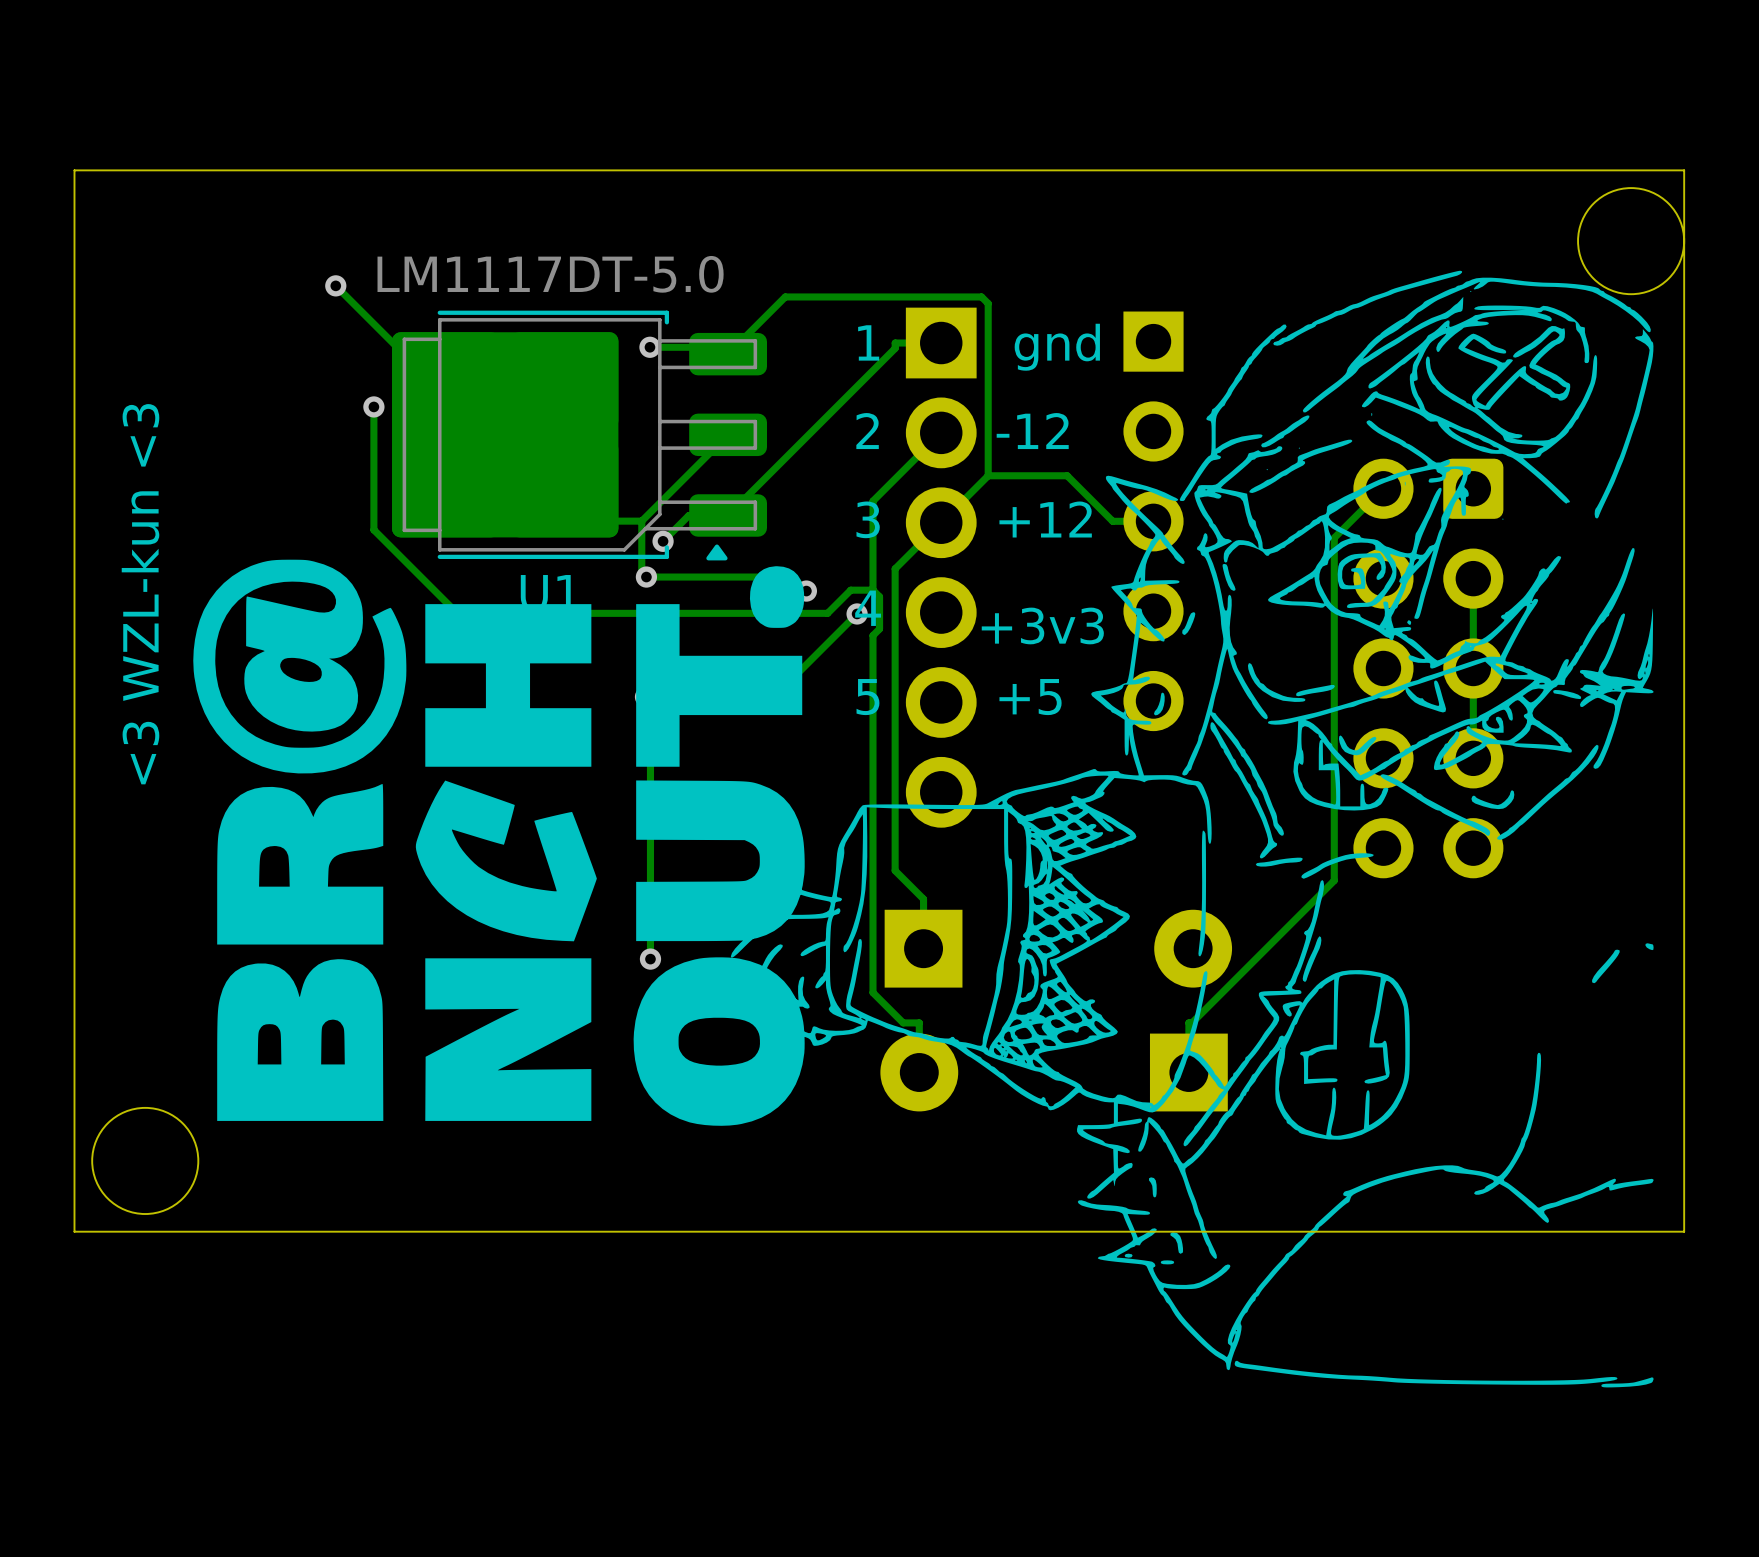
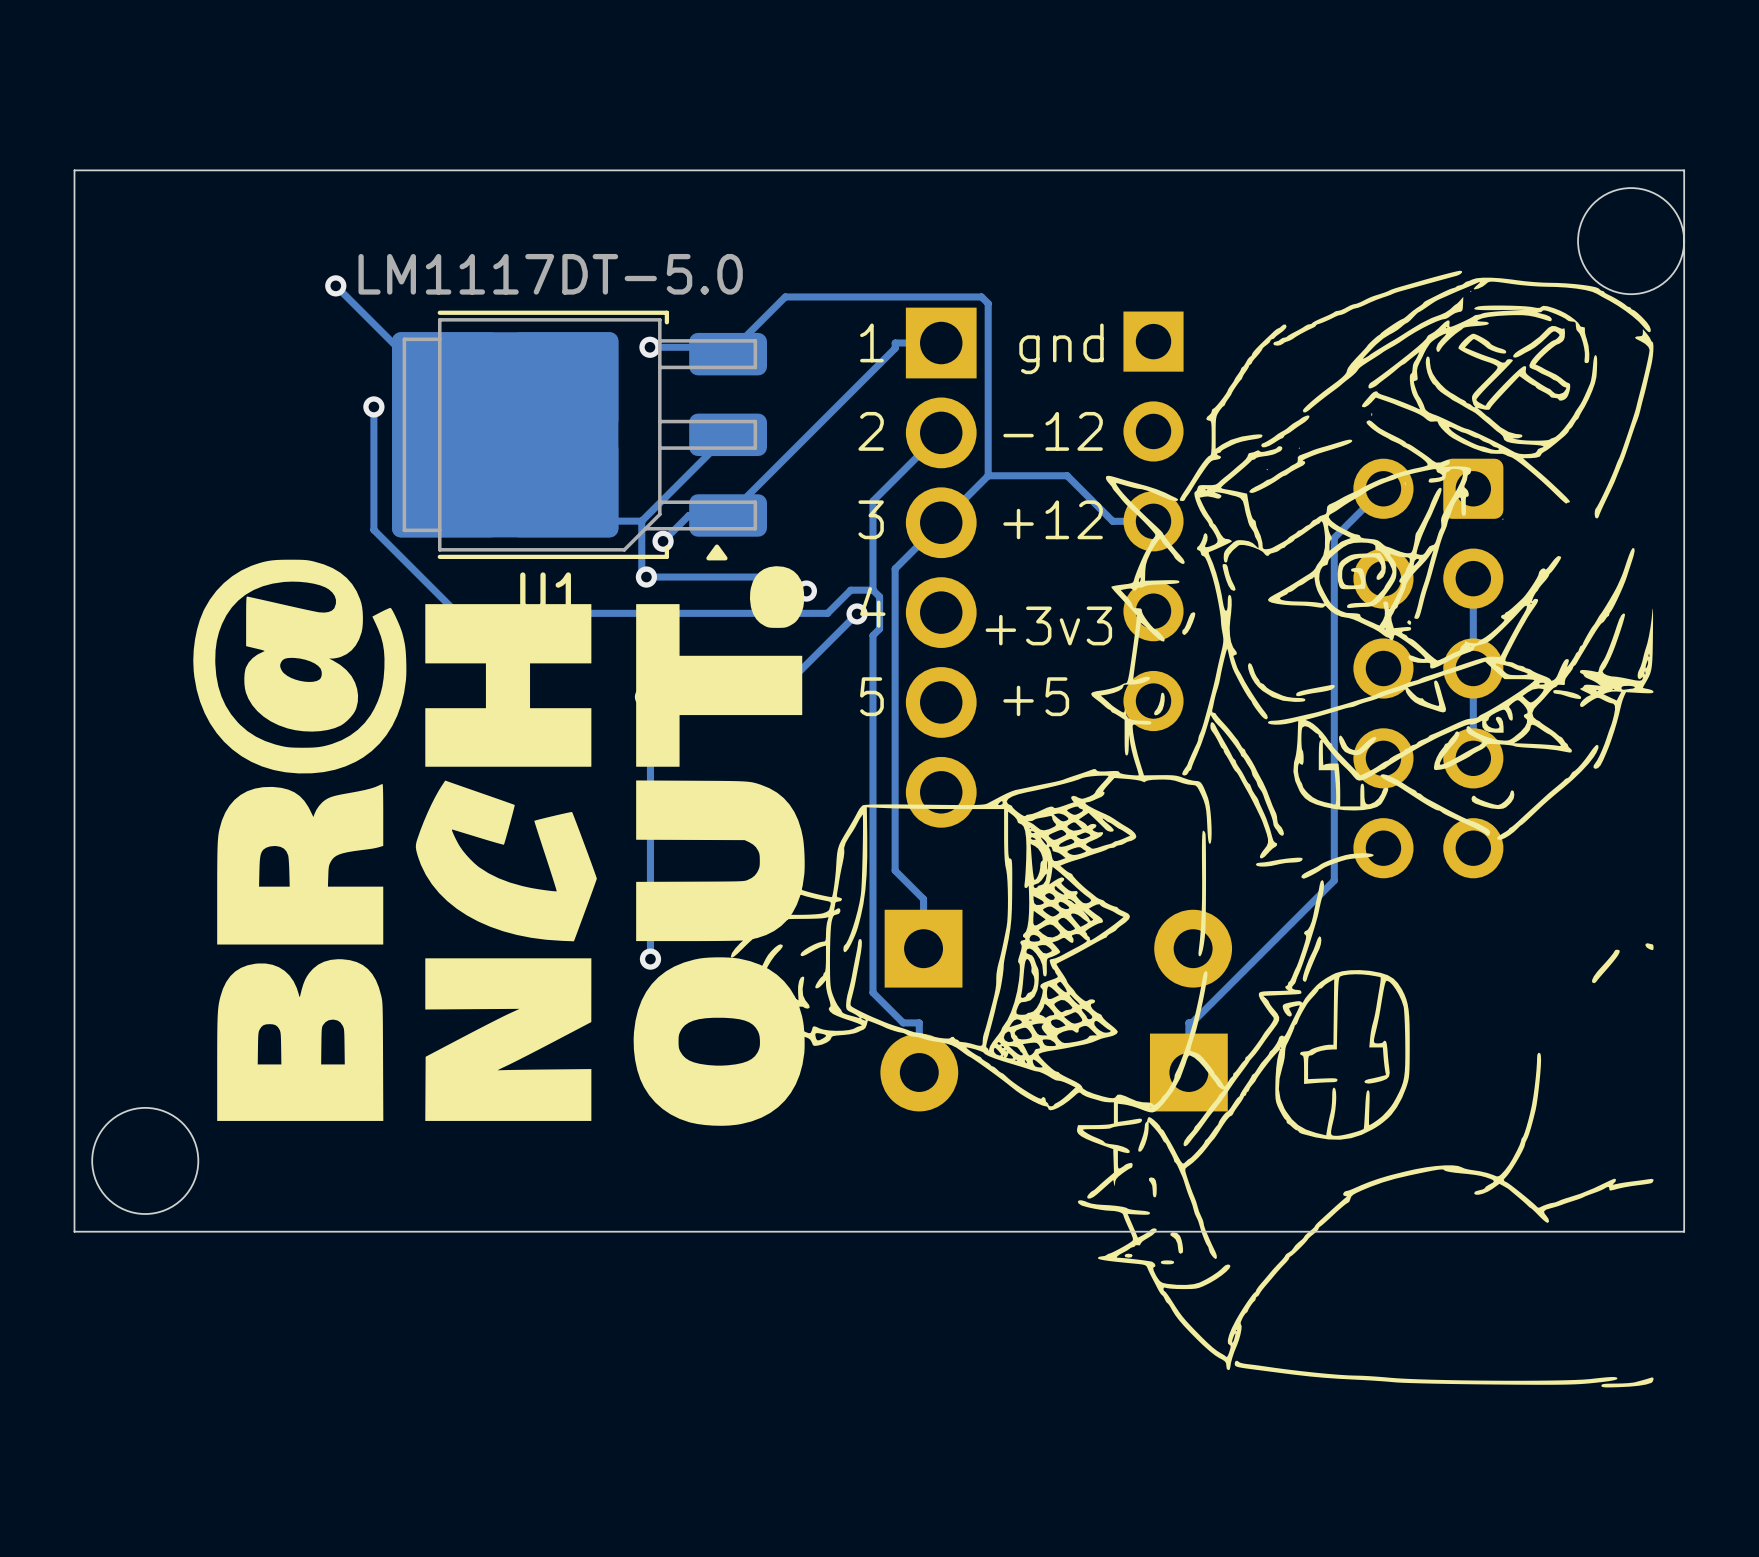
text: <3 WZL-kun <3 (140, 594) -> none

